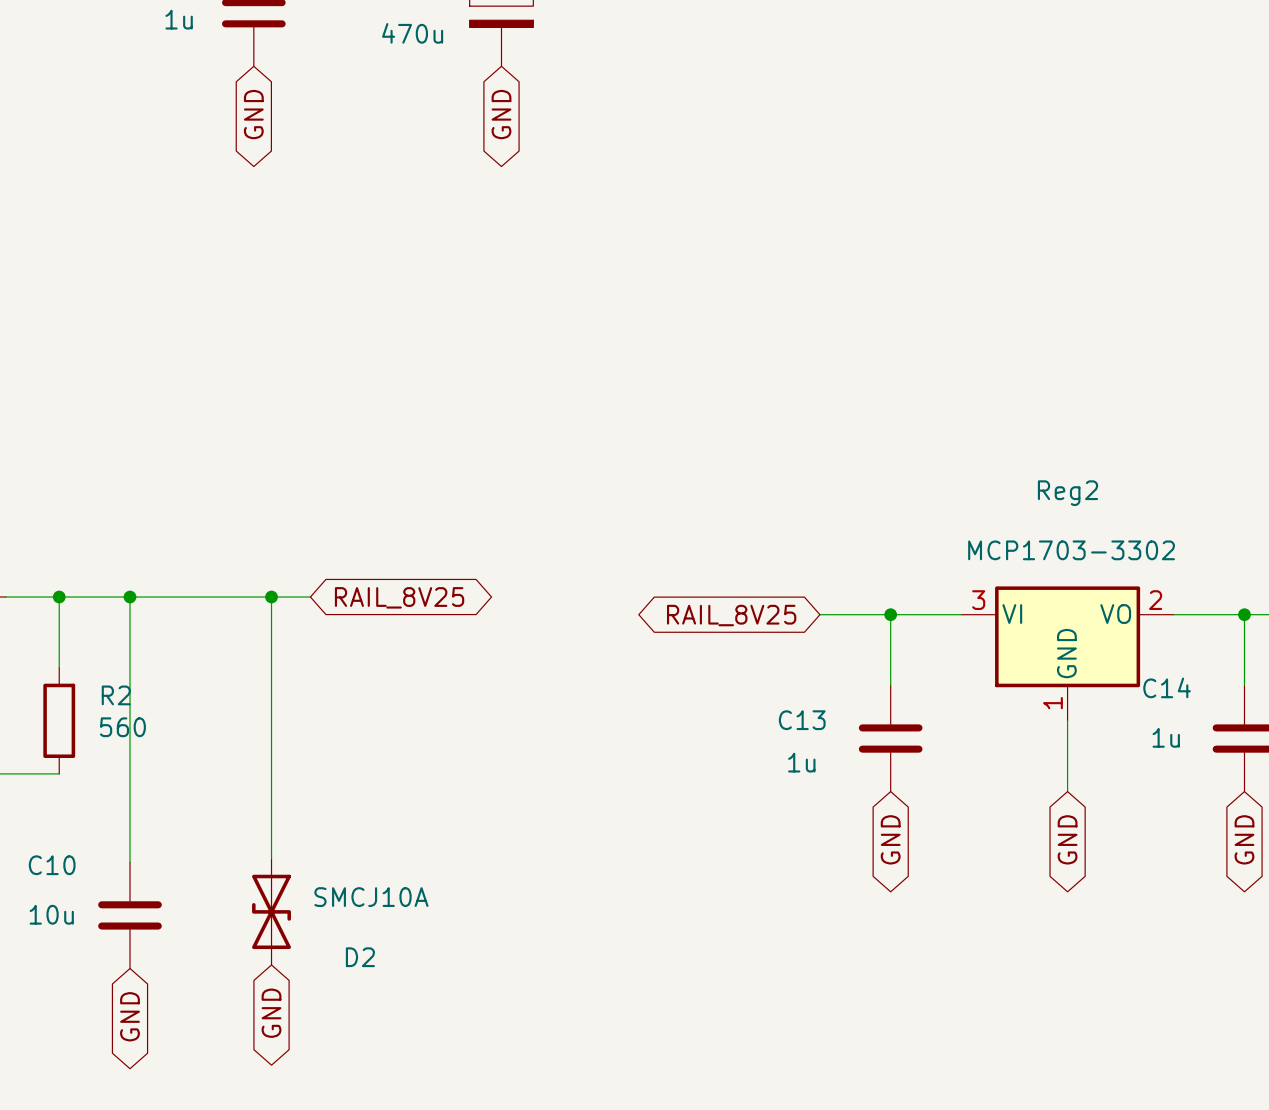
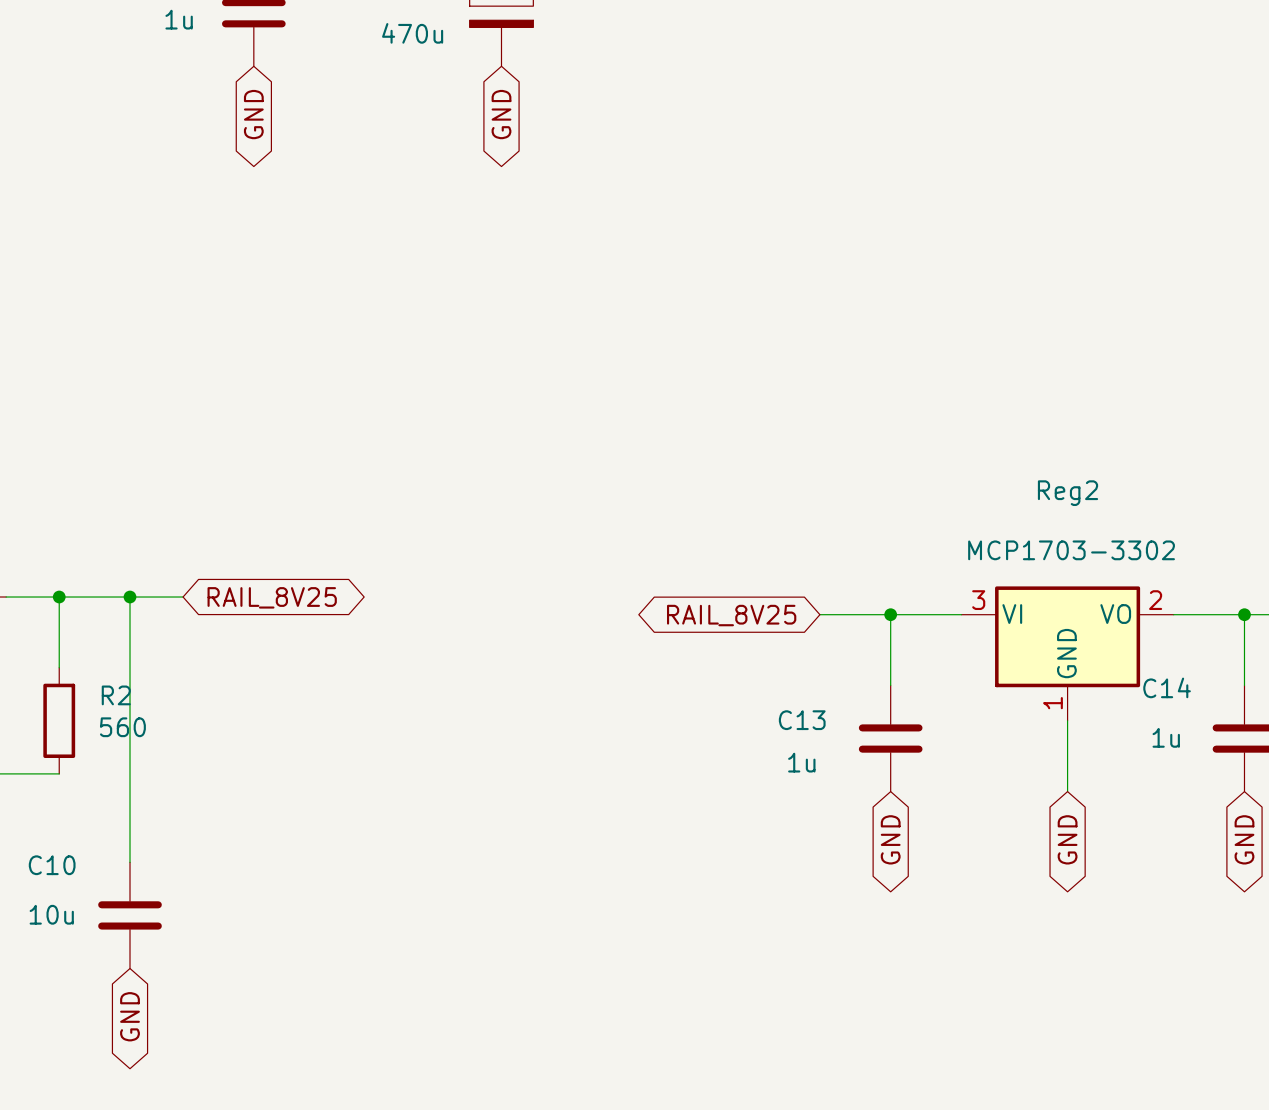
wire: (183, 597) (310, 597) -> none
wire: (271, 597) (271, 858) -> none
junction: (271, 597) -> none
global label position: RAIL_8V25 (399, 597) -> RAIL_8V25 (272, 597)
D2: SMCJ10A (271, 911) -> none
global label: GND (271, 1013) -> none

